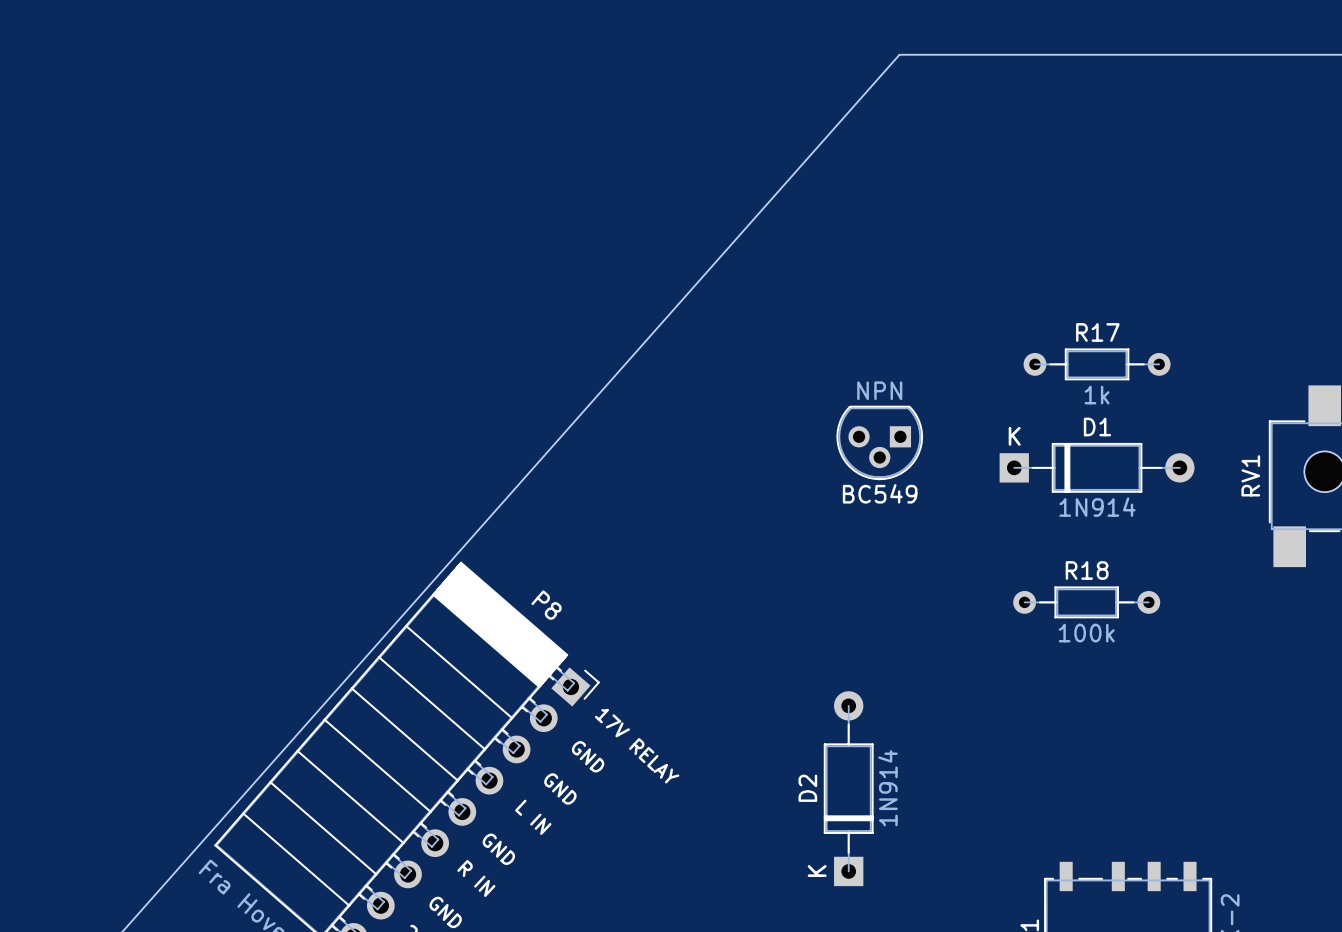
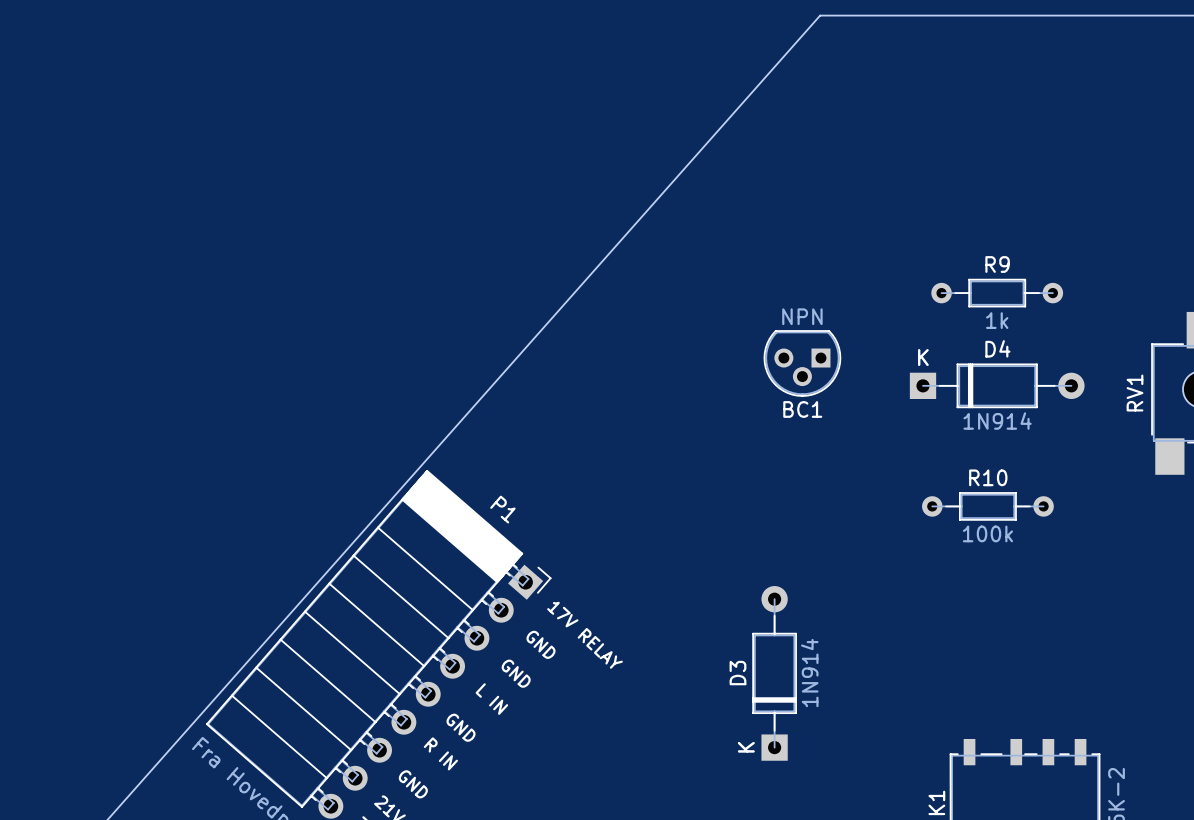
R17 name: R17 (1097, 332) -> R9 (997, 264)
D1 name: D1 (1097, 427) -> D4 (997, 348)
BC549 name: BC549 (880, 493) -> BC1 (802, 409)
R18 name: R18 (1087, 570) -> R10 (988, 477)
P8 name: P8 (546, 605) -> P1 (502, 509)
D2 name: D2 (807, 788) -> D3 (737, 673)

